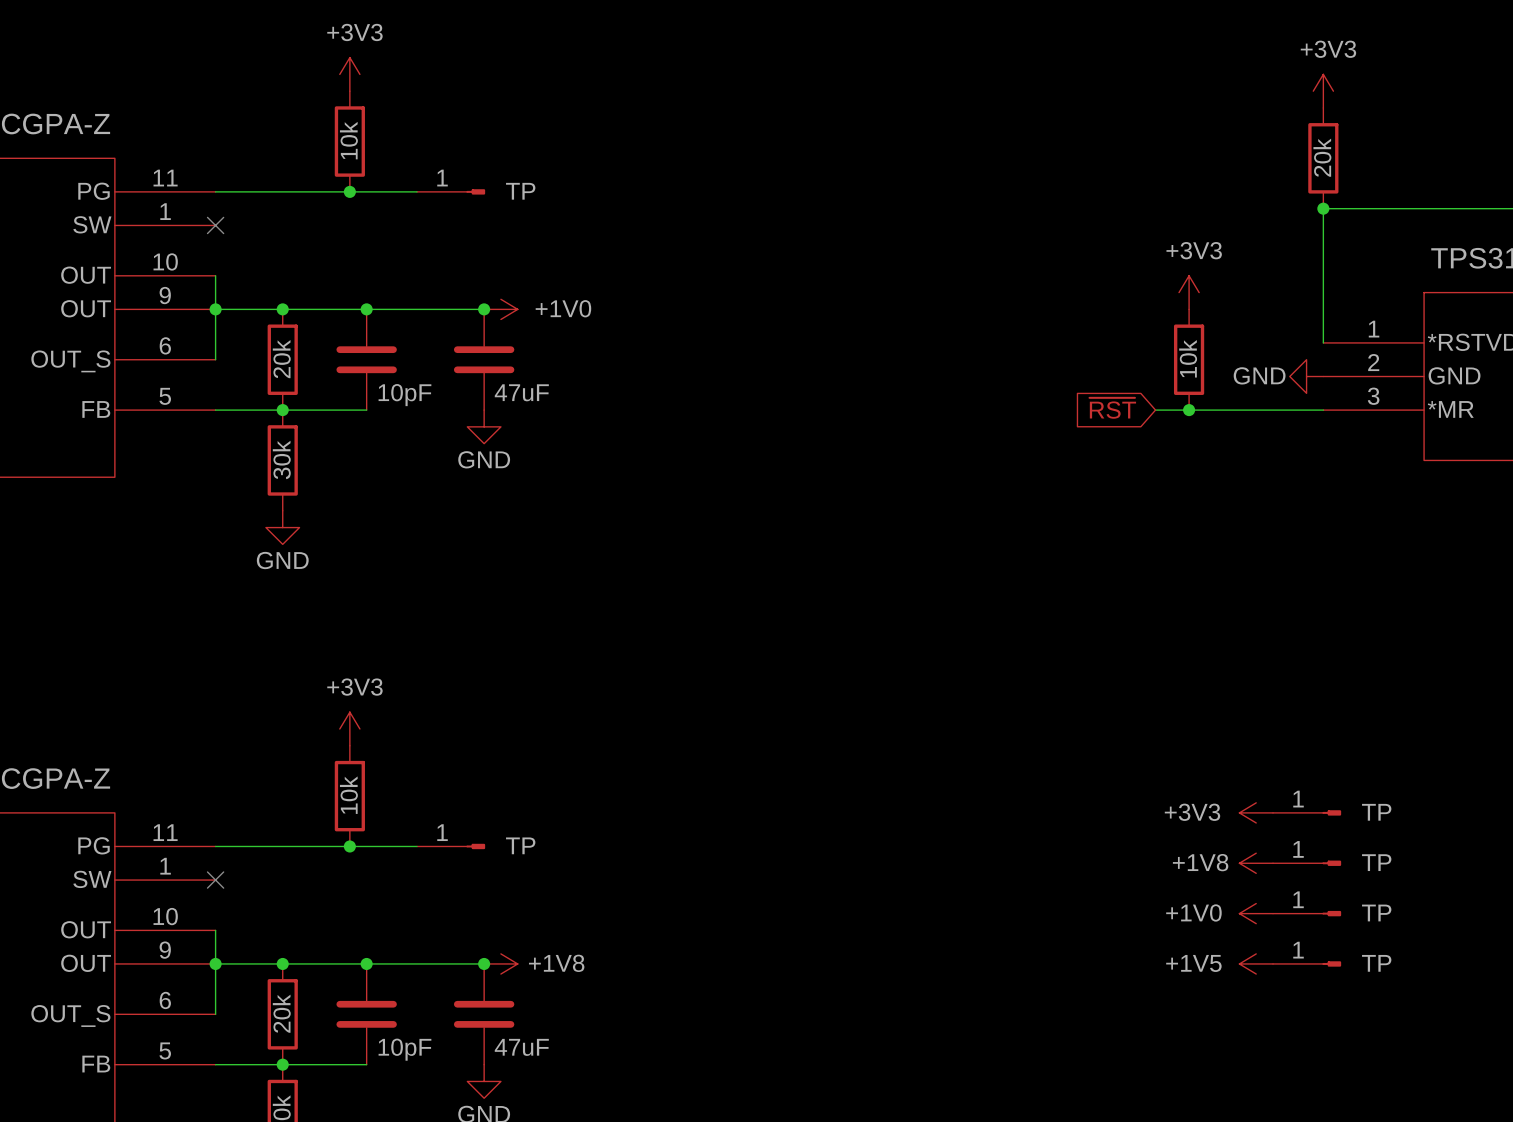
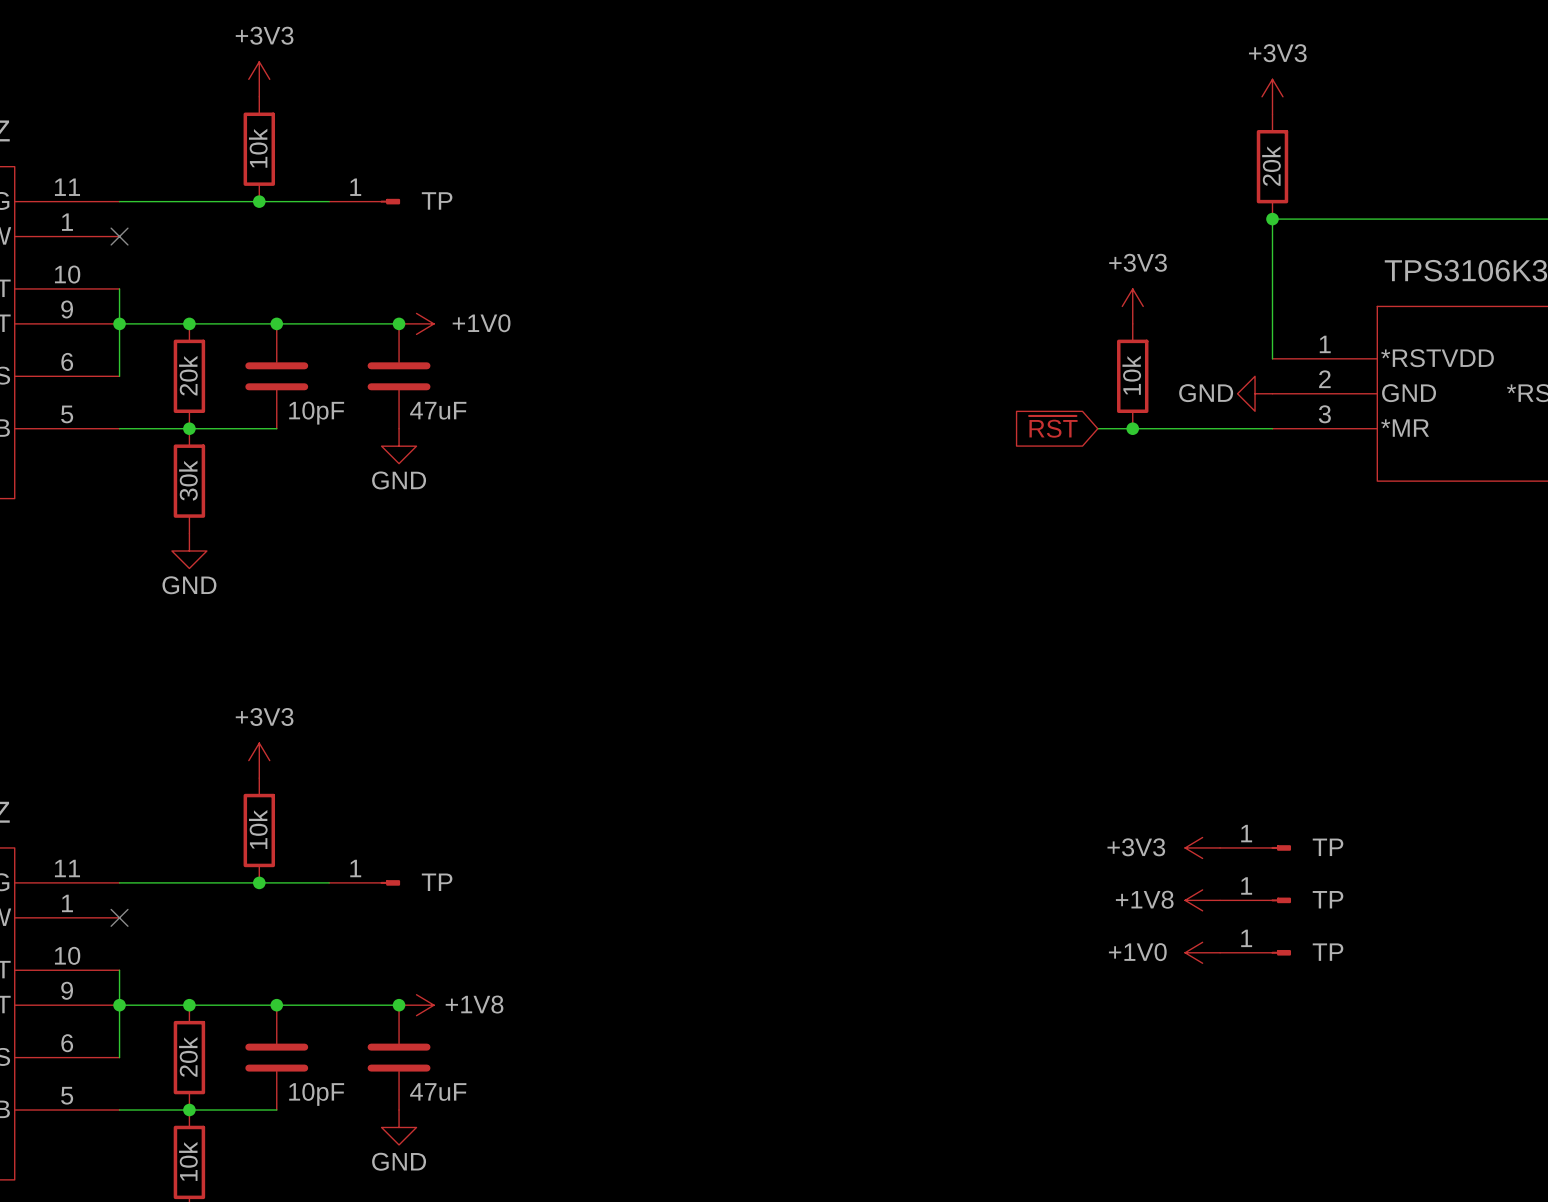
power symbol: +1V5 (1256, 963) -> none
part: TP (1307, 963) -> none

